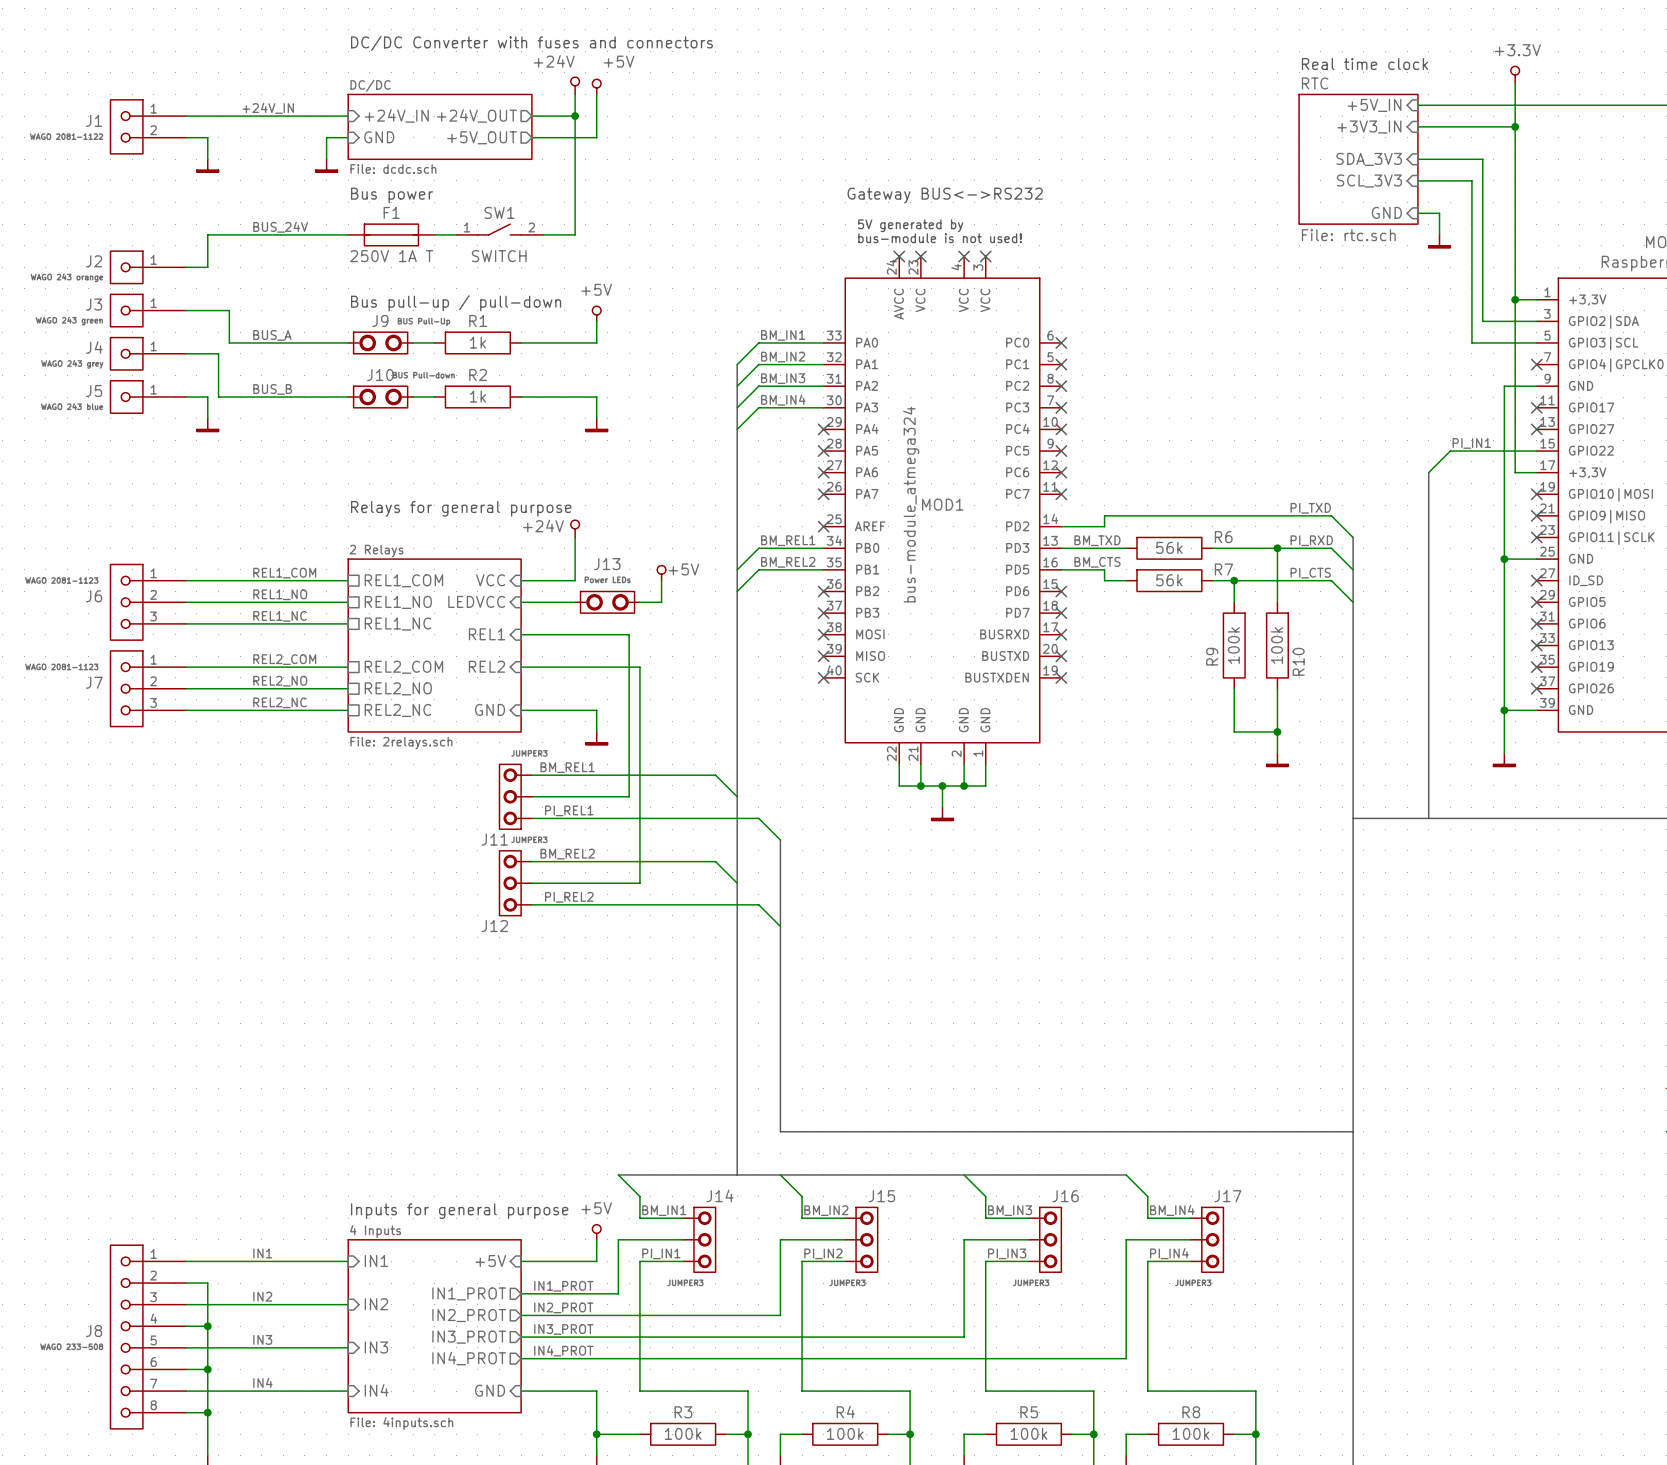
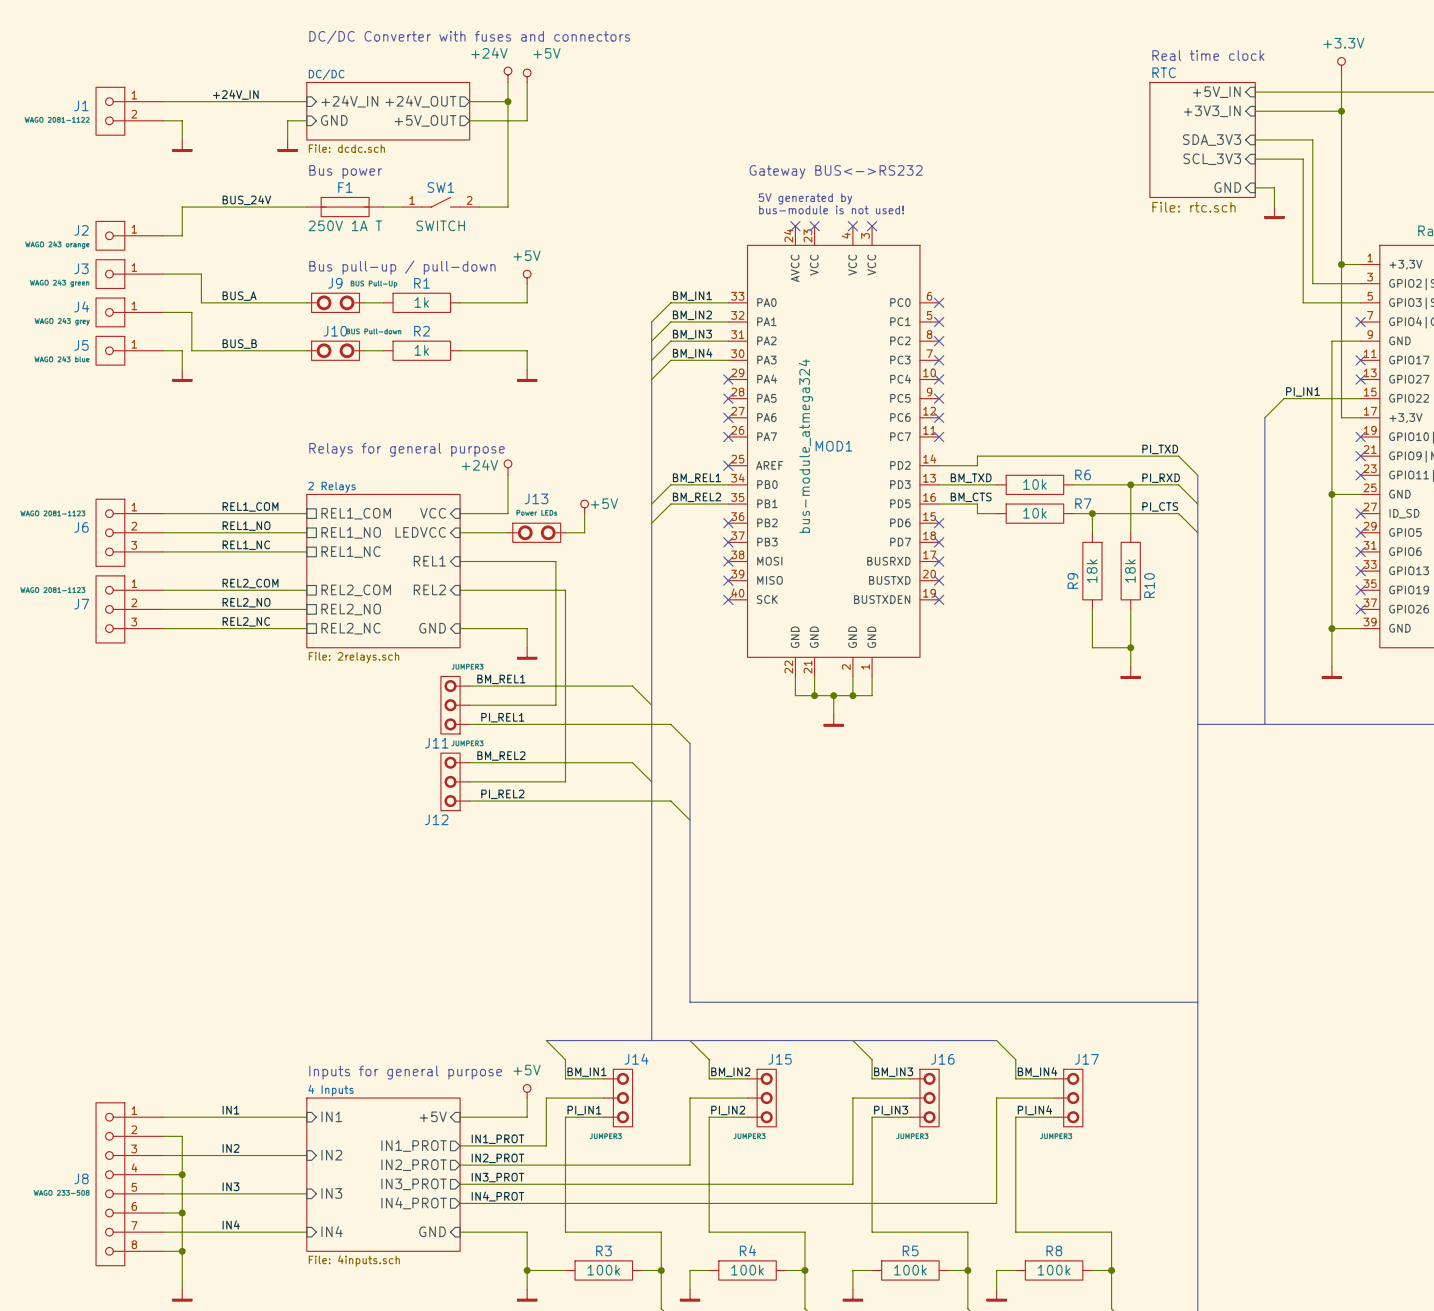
R6 value: 56k (1169, 547) -> 10k (1034, 484)
R7 value: 56k (1169, 580) -> 10k (1034, 513)
R9 value: 100k (1233, 645) -> 18k (1092, 571)
R10 value: 100k (1277, 645) -> 18k (1130, 571)

